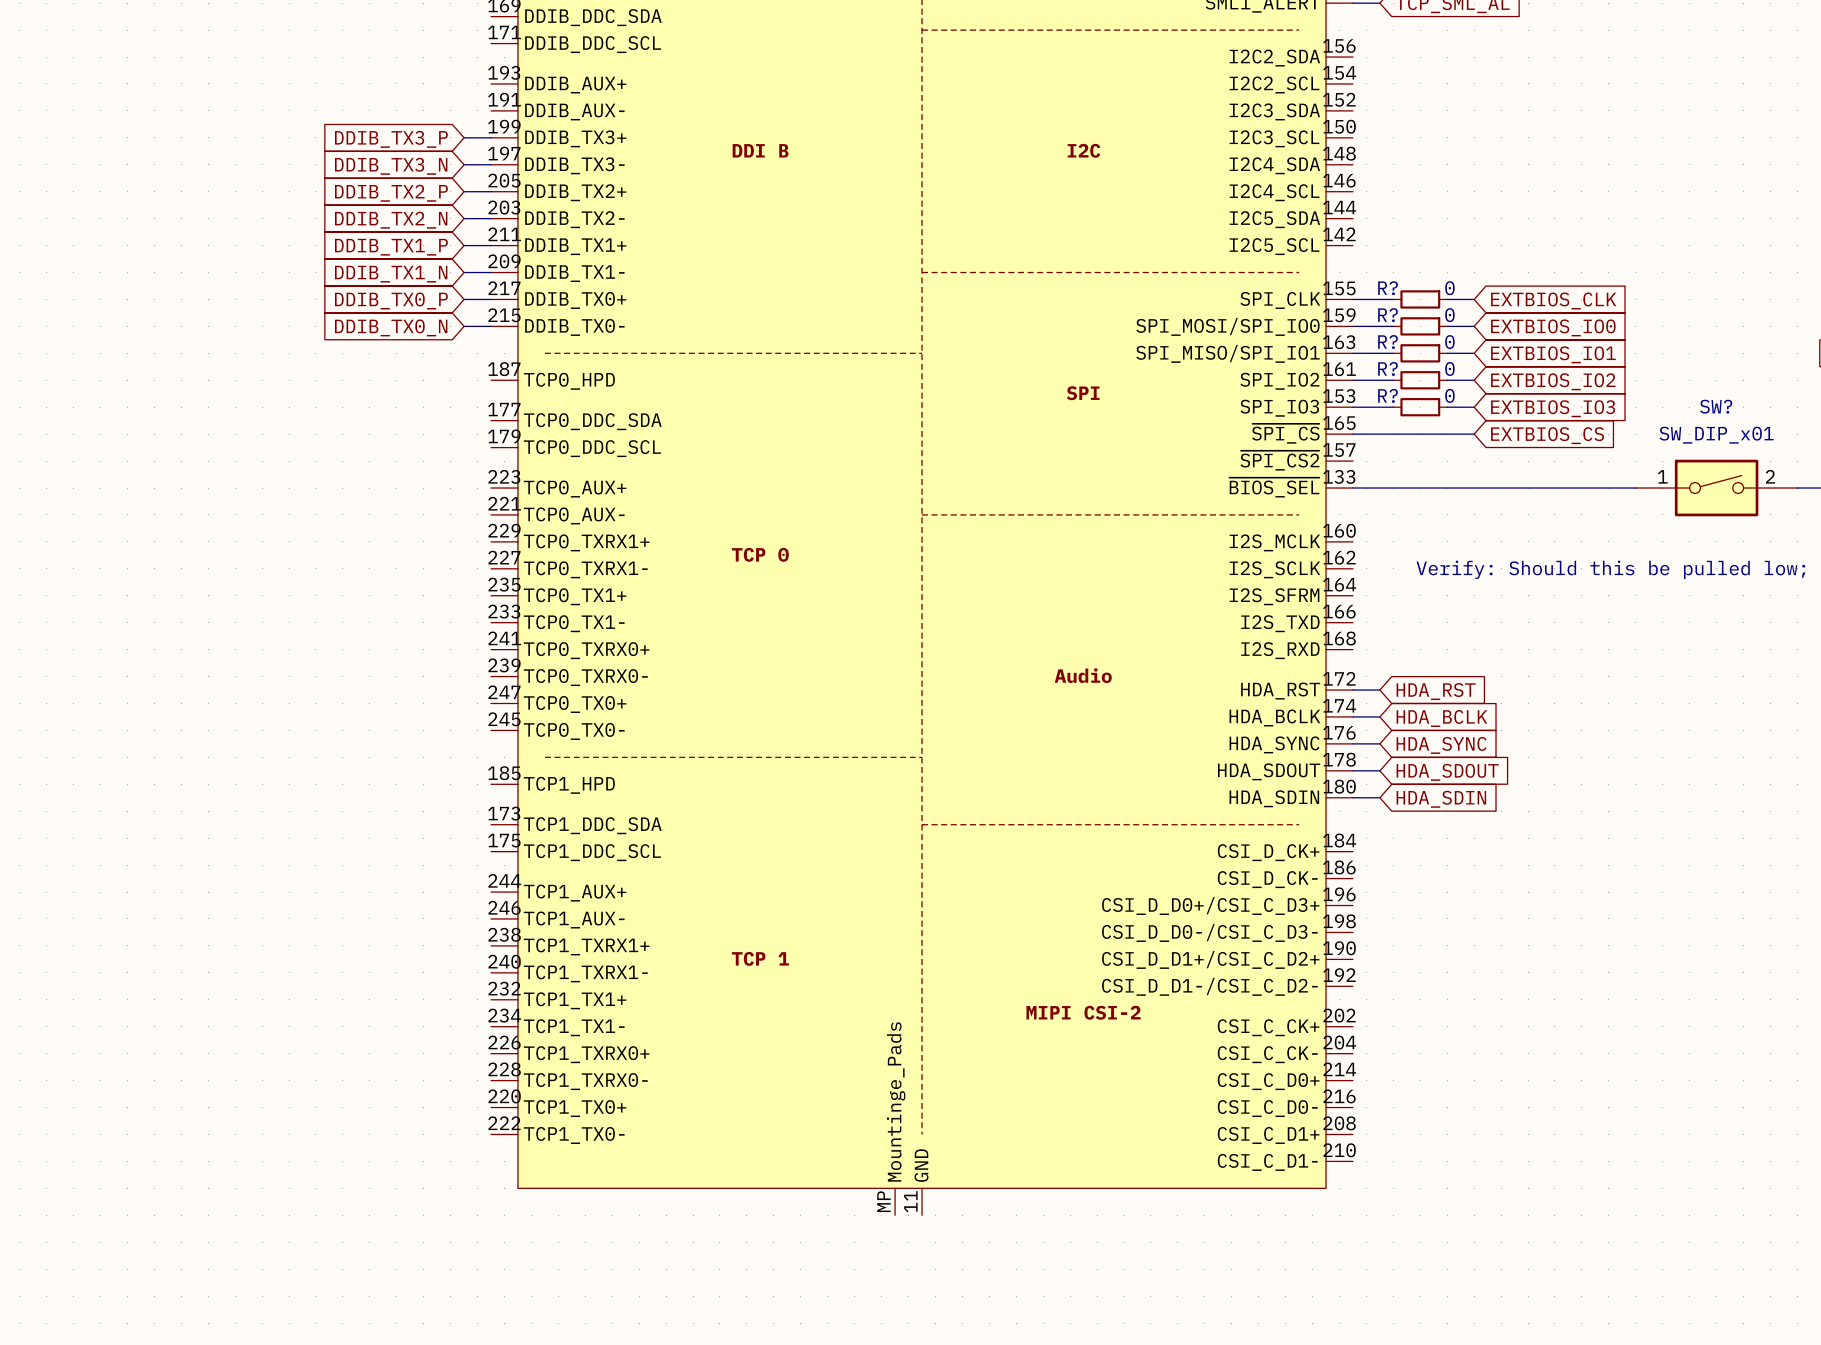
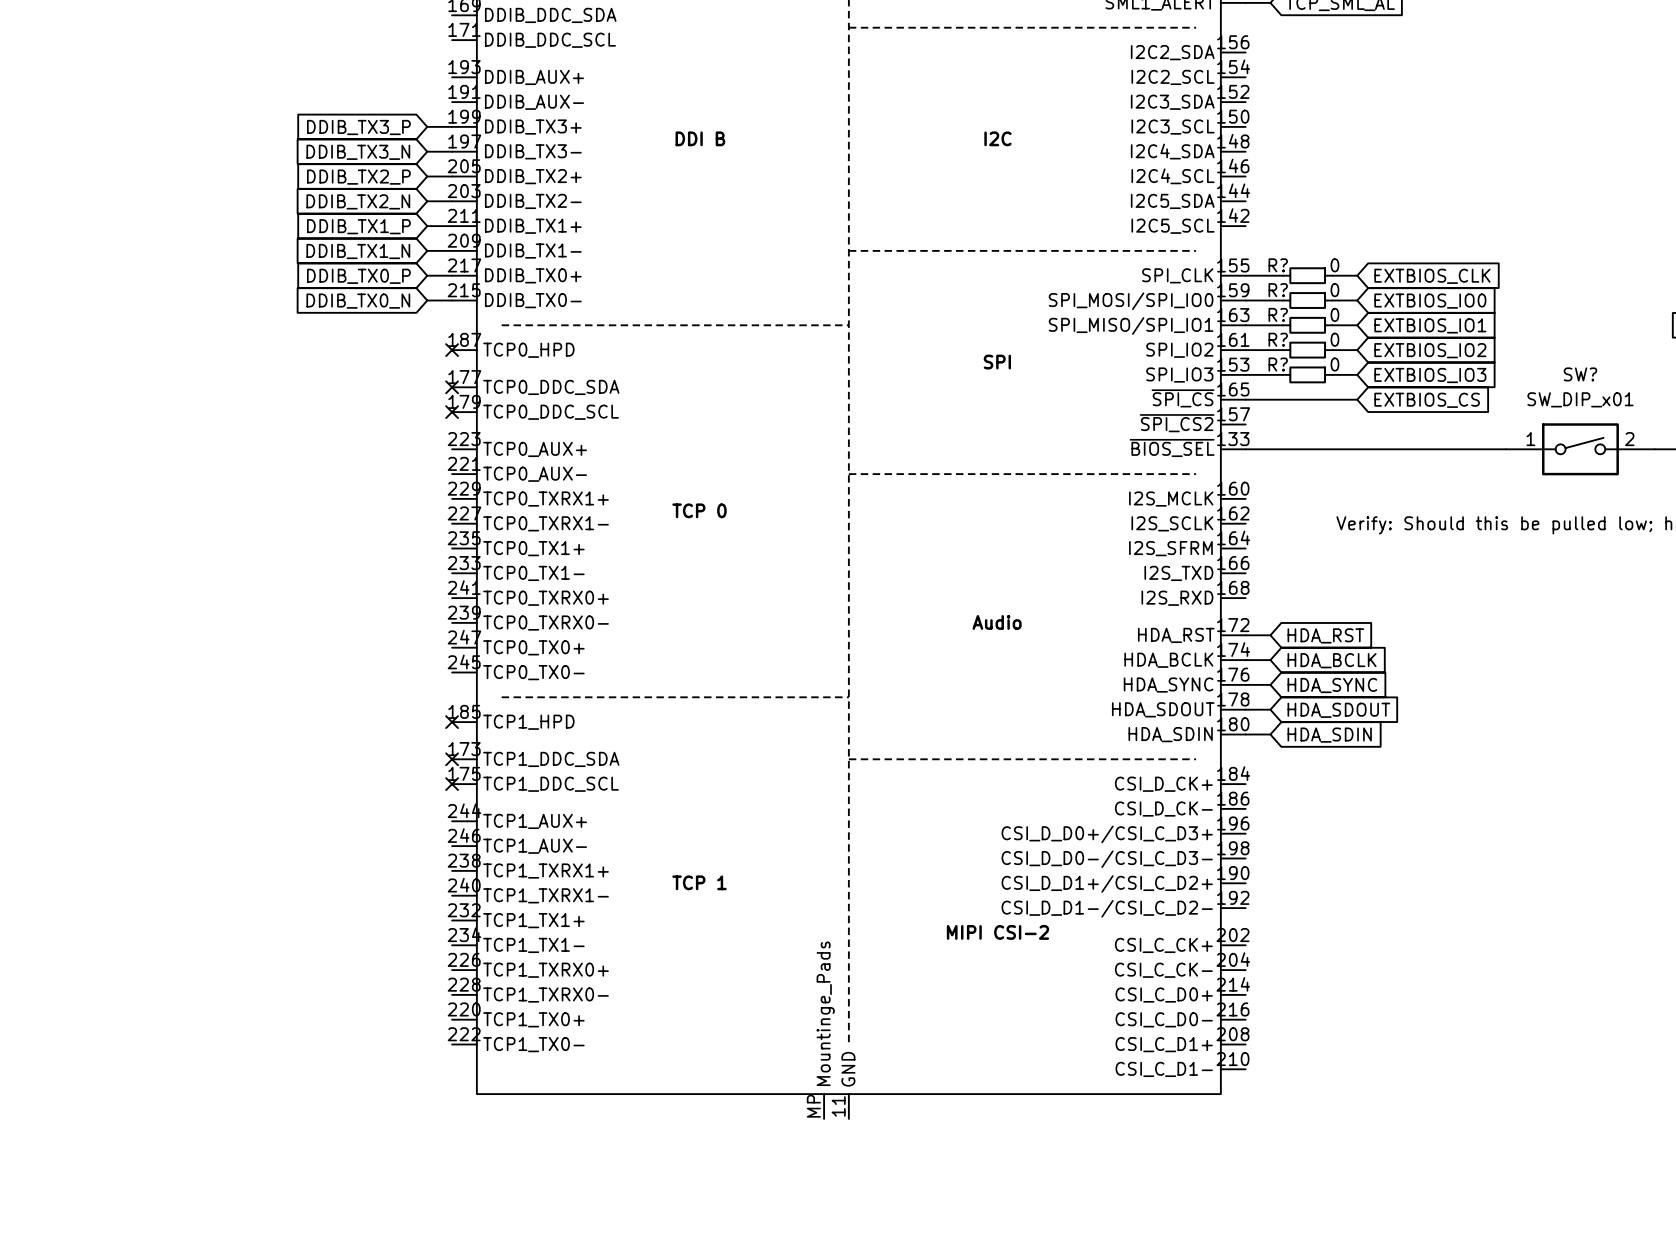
no-connect mark: none -> (452, 350)
no-connect mark: none -> (452, 387)
no-connect mark: none -> (452, 412)
no-connect mark: none -> (452, 722)
no-connect mark: none -> (452, 759)
no-connect mark: none -> (452, 784)

